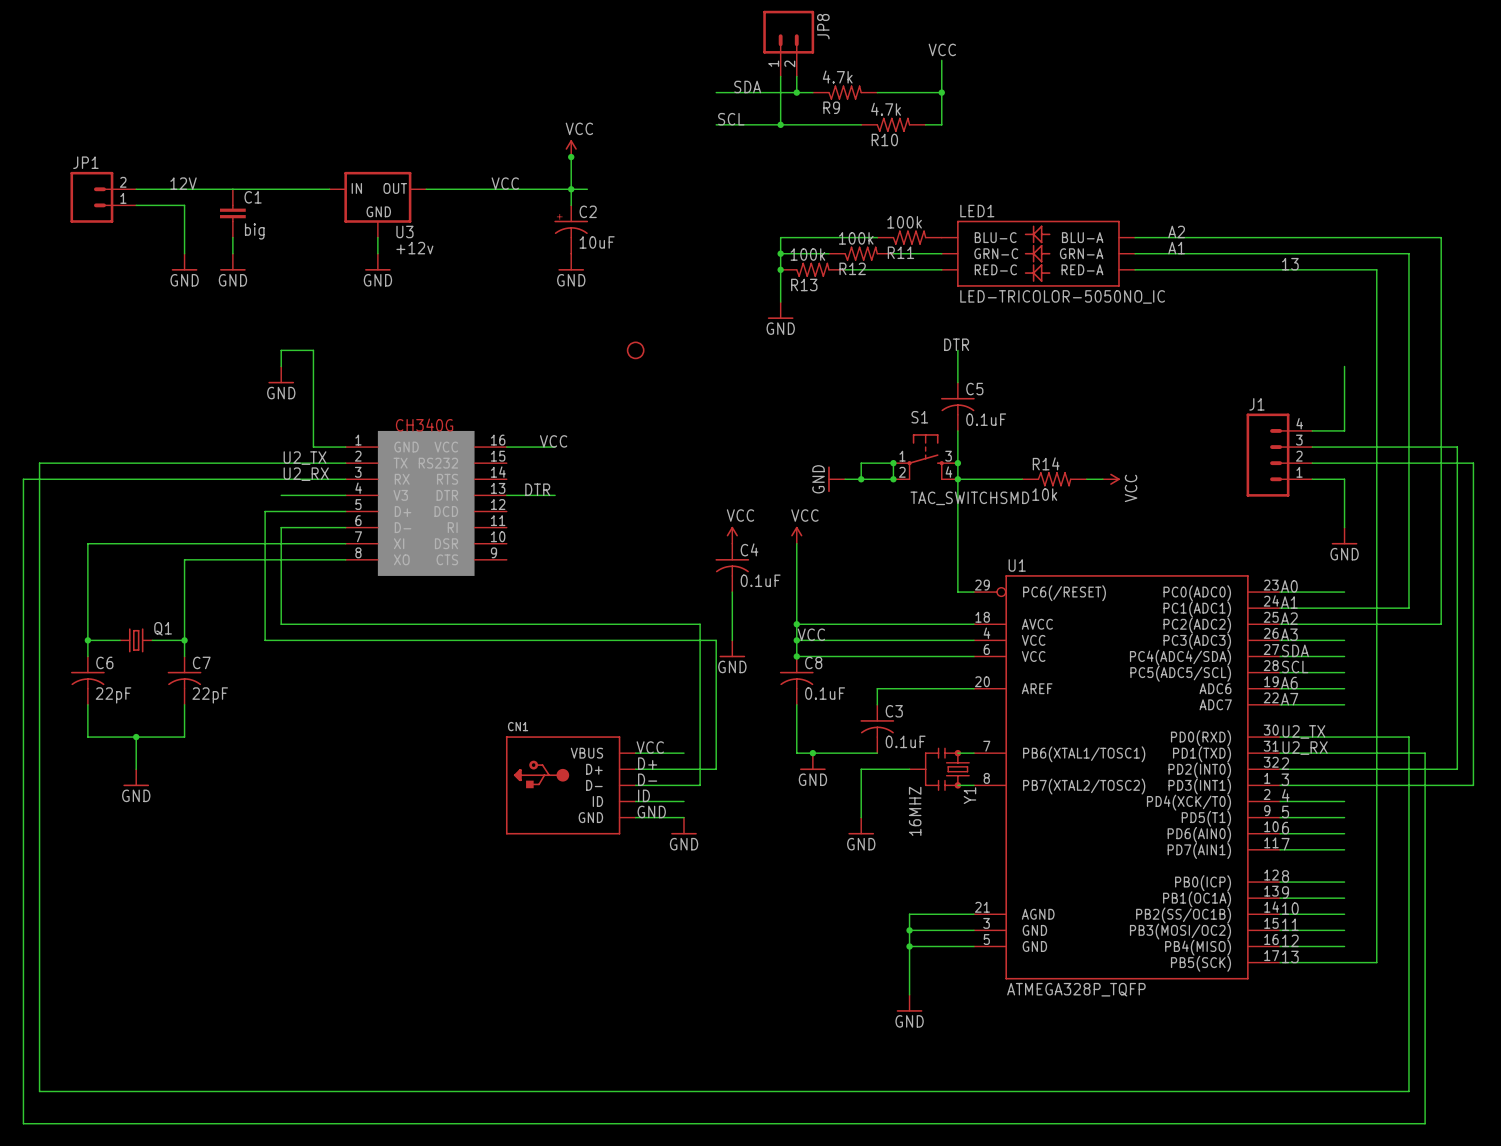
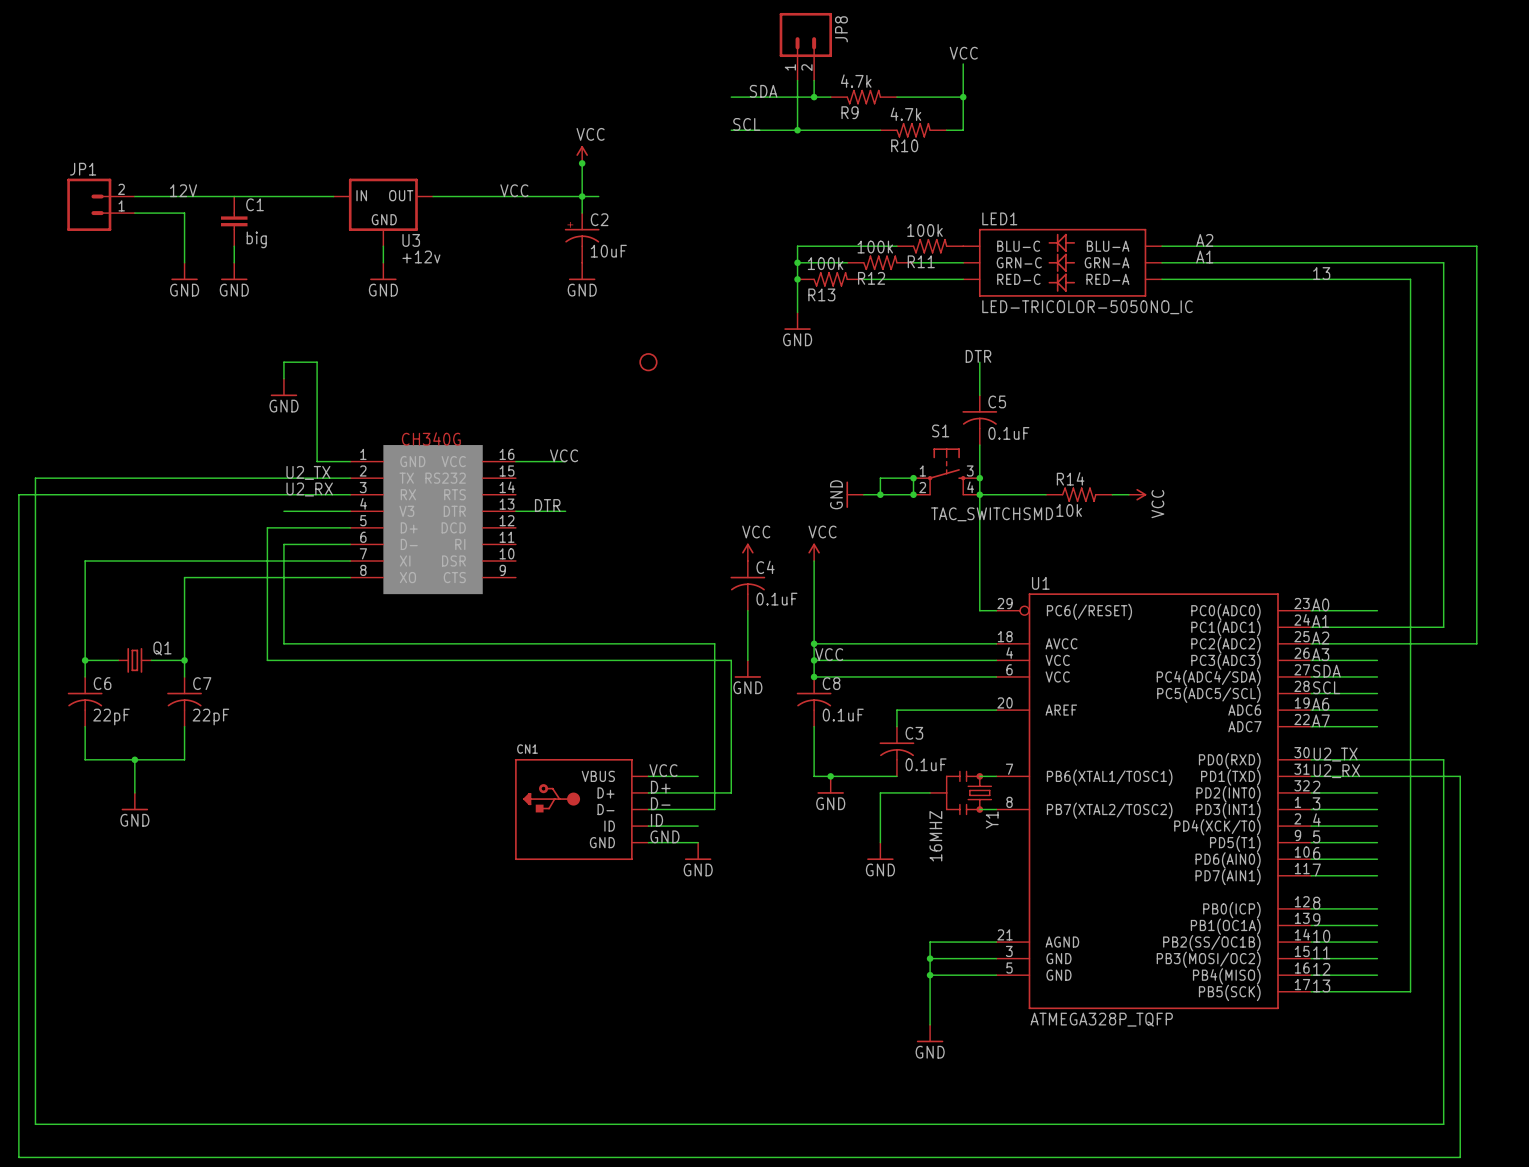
wire: (1344, 366) (1344, 430) (1312, 430) -> none
wire: (1312, 447) (1457, 447) (1457, 769) (1344, 769) -> none
J1: (1279, 455) -> none
wire: (1312, 463) (1473, 463) (1473, 785) (1344, 785) -> none
wire: (1312, 479) (1344, 479) (1344, 527) -> none
power symbol: GND (1344, 536) -> none

